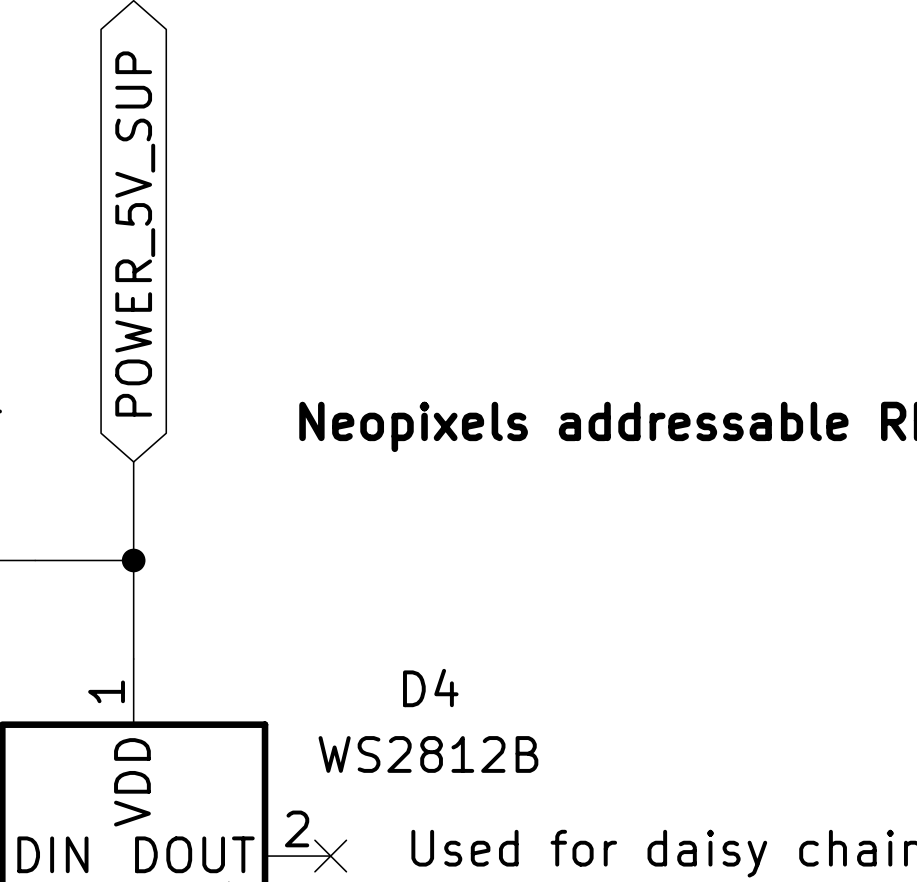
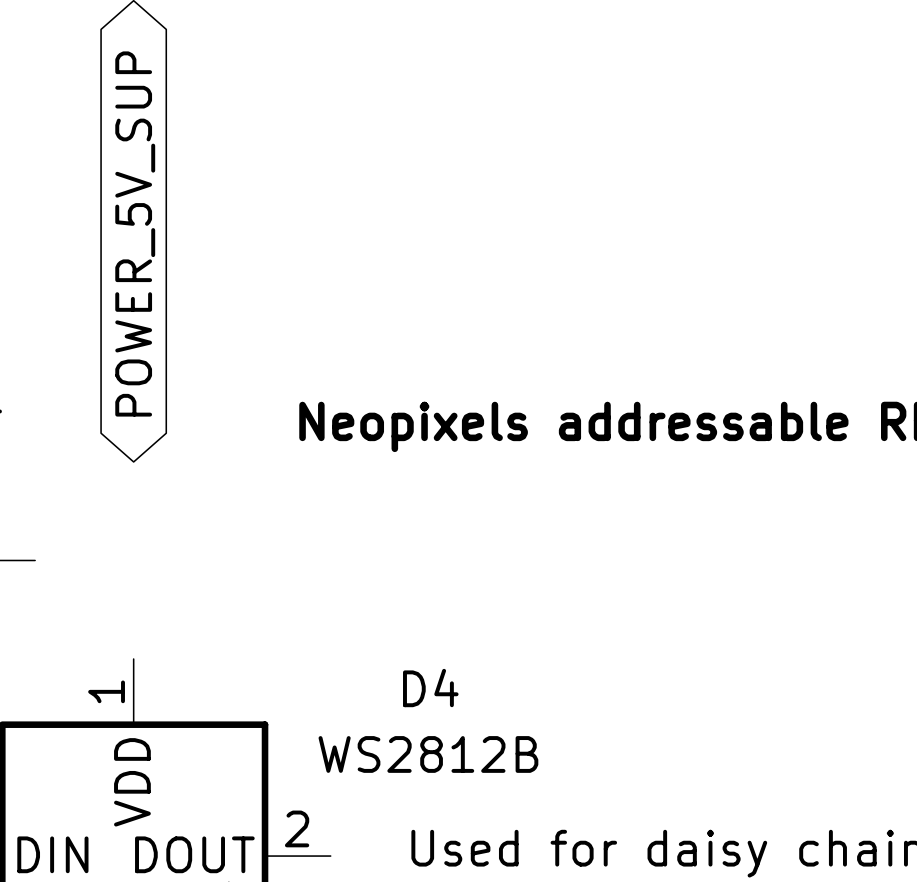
wire: (133, 461) (133, 659) -> none
wire: (35, 560) (133, 560) -> none
junction: (133, 560) -> none
no-connect mark: (330, 856) -> none

